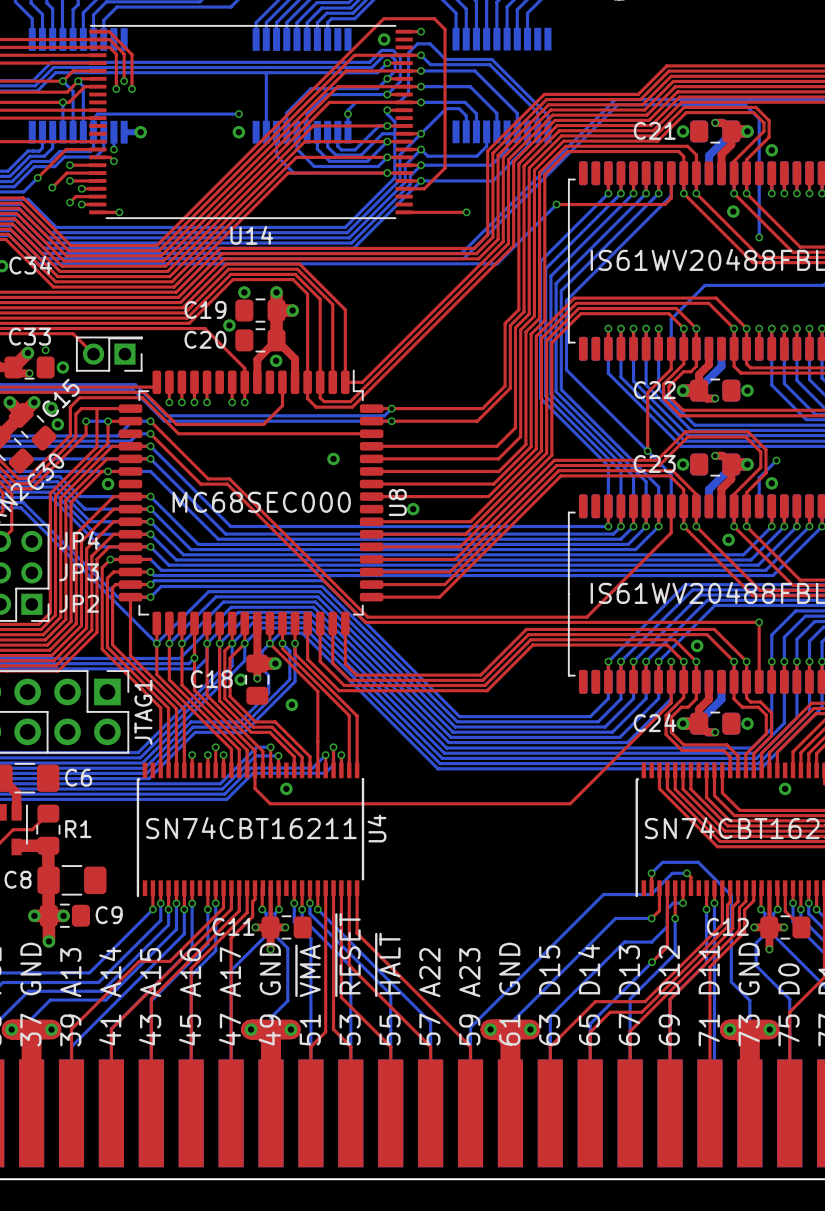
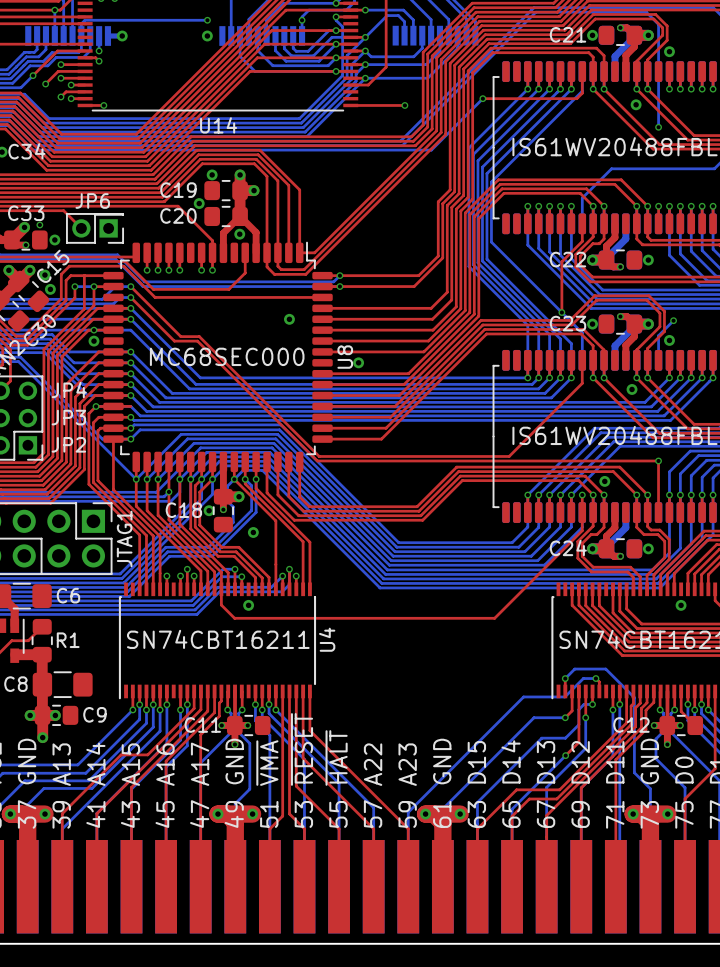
text: none -> JP6 (92, 200)

